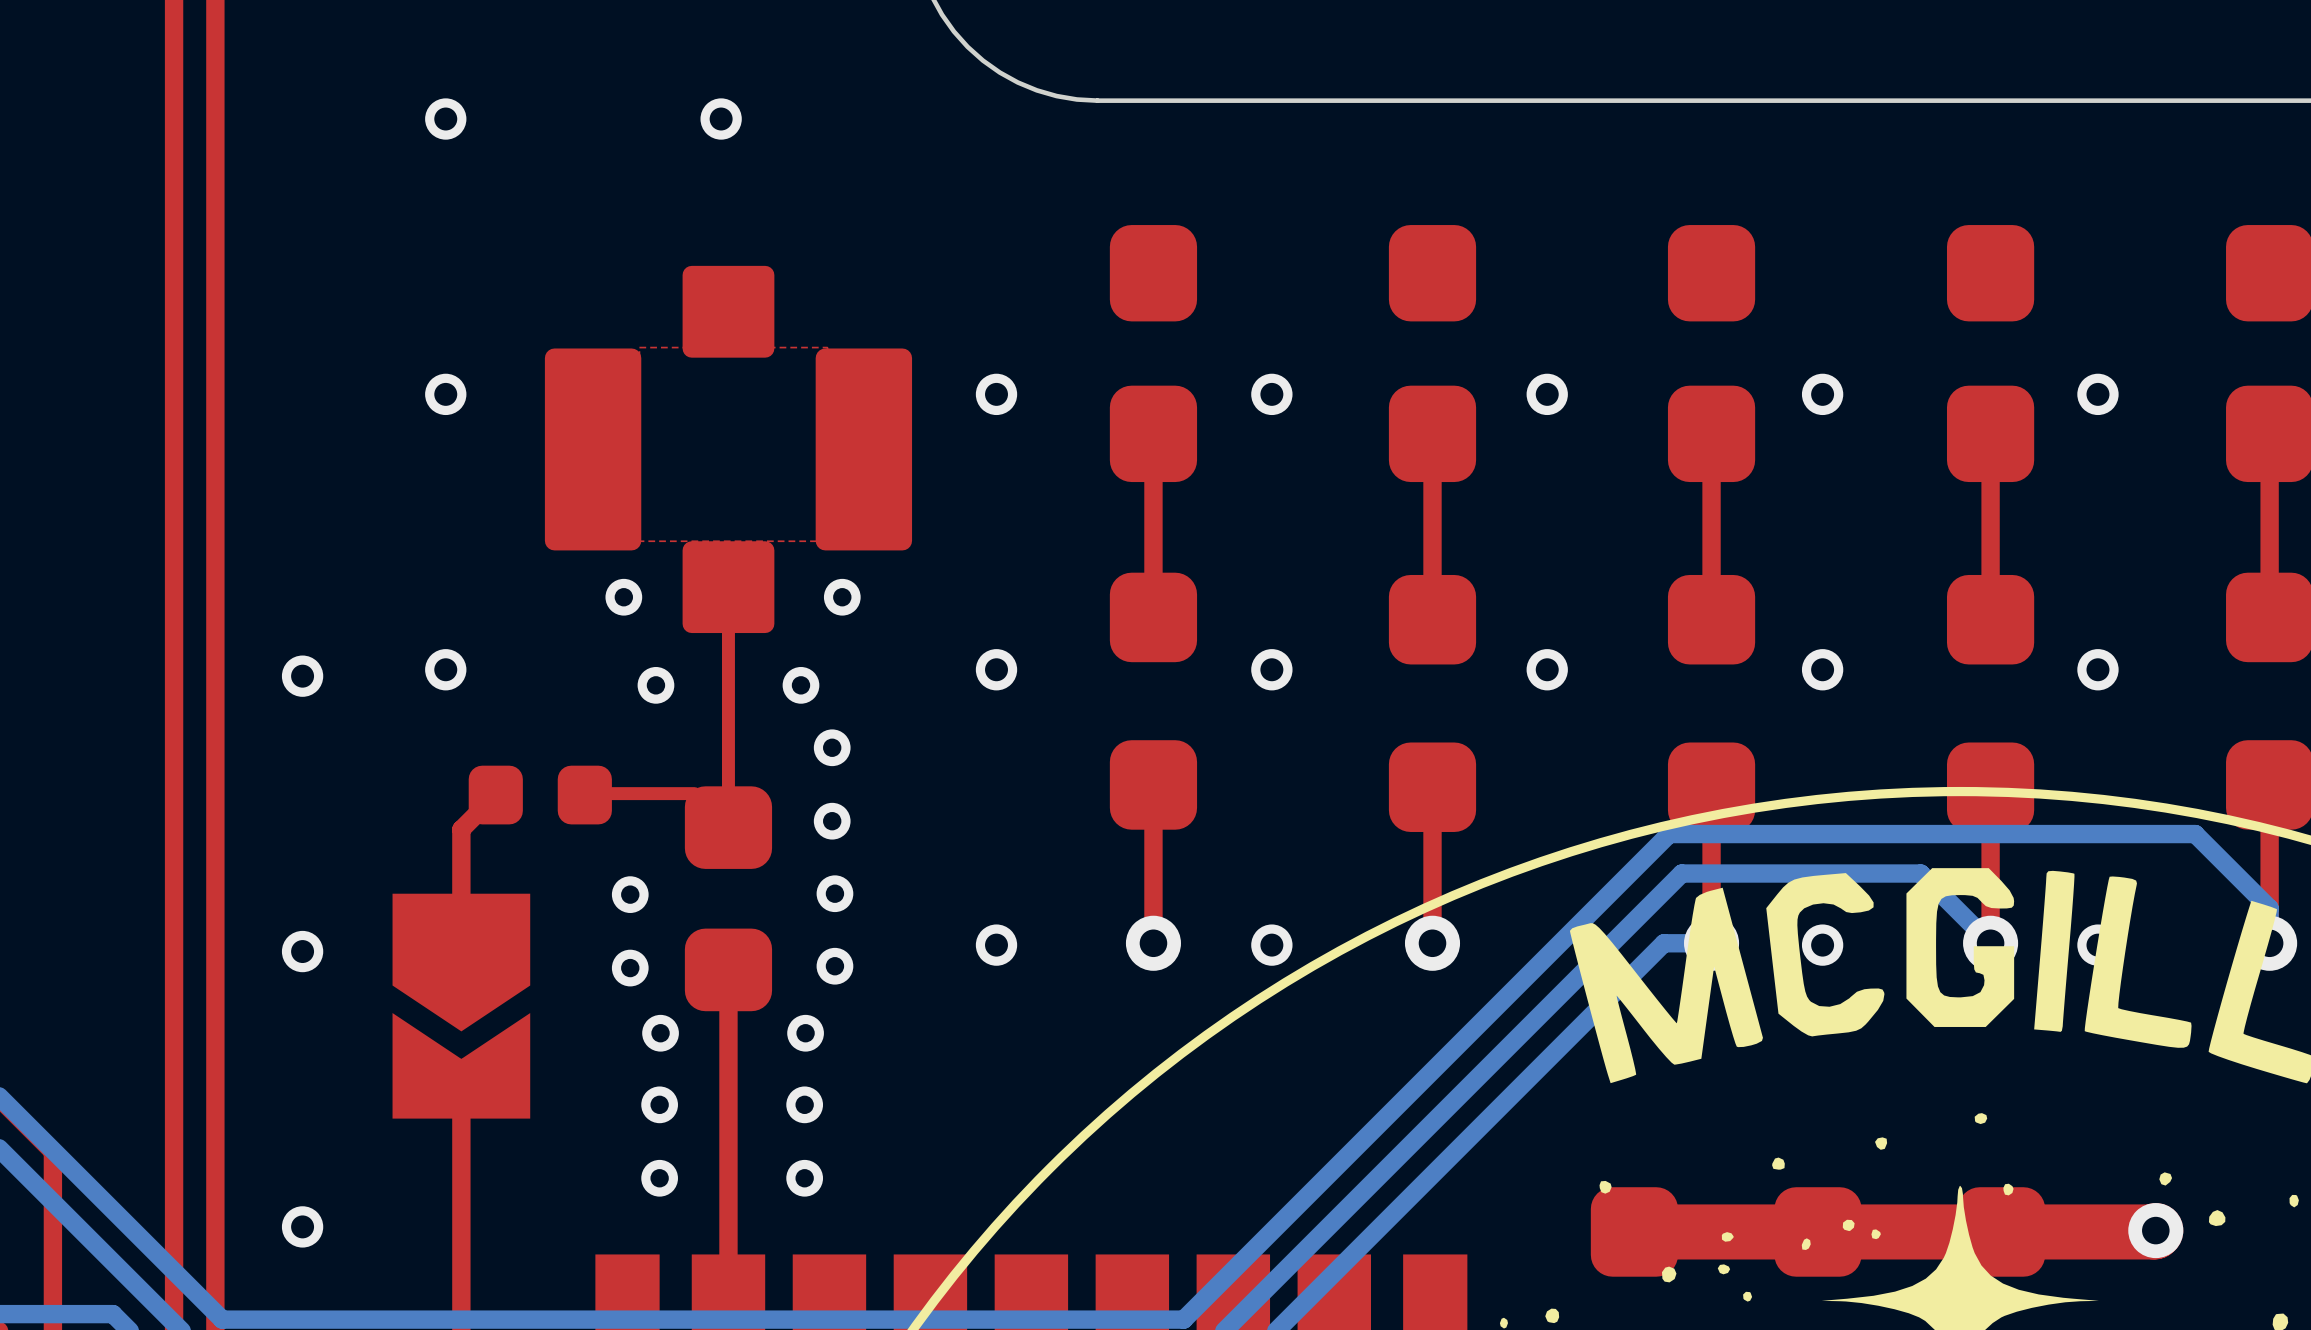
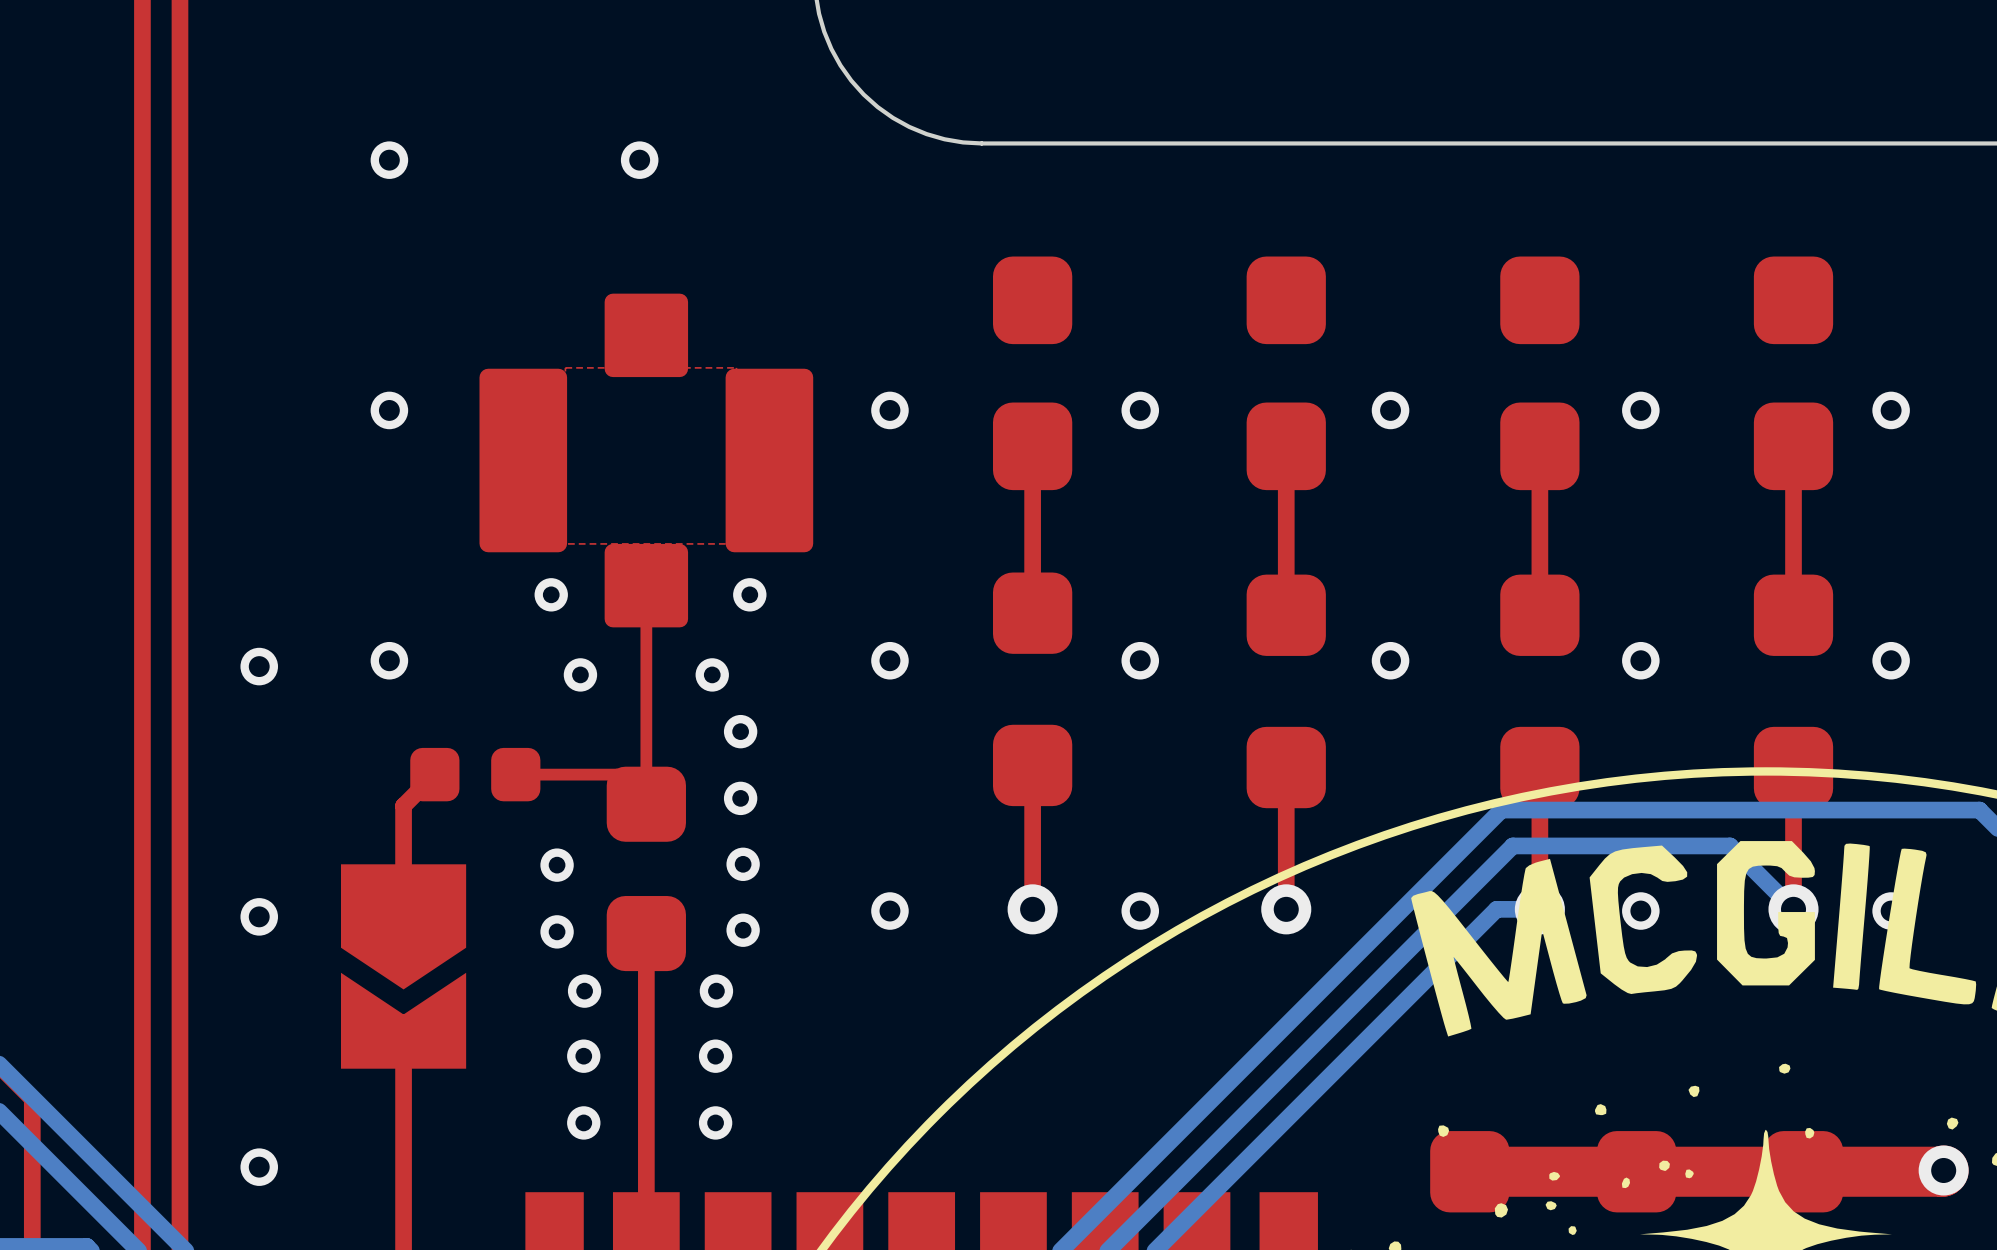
top track: (694, 793) (584, 795) -> (646, 804) (616, 774) (515, 774)

